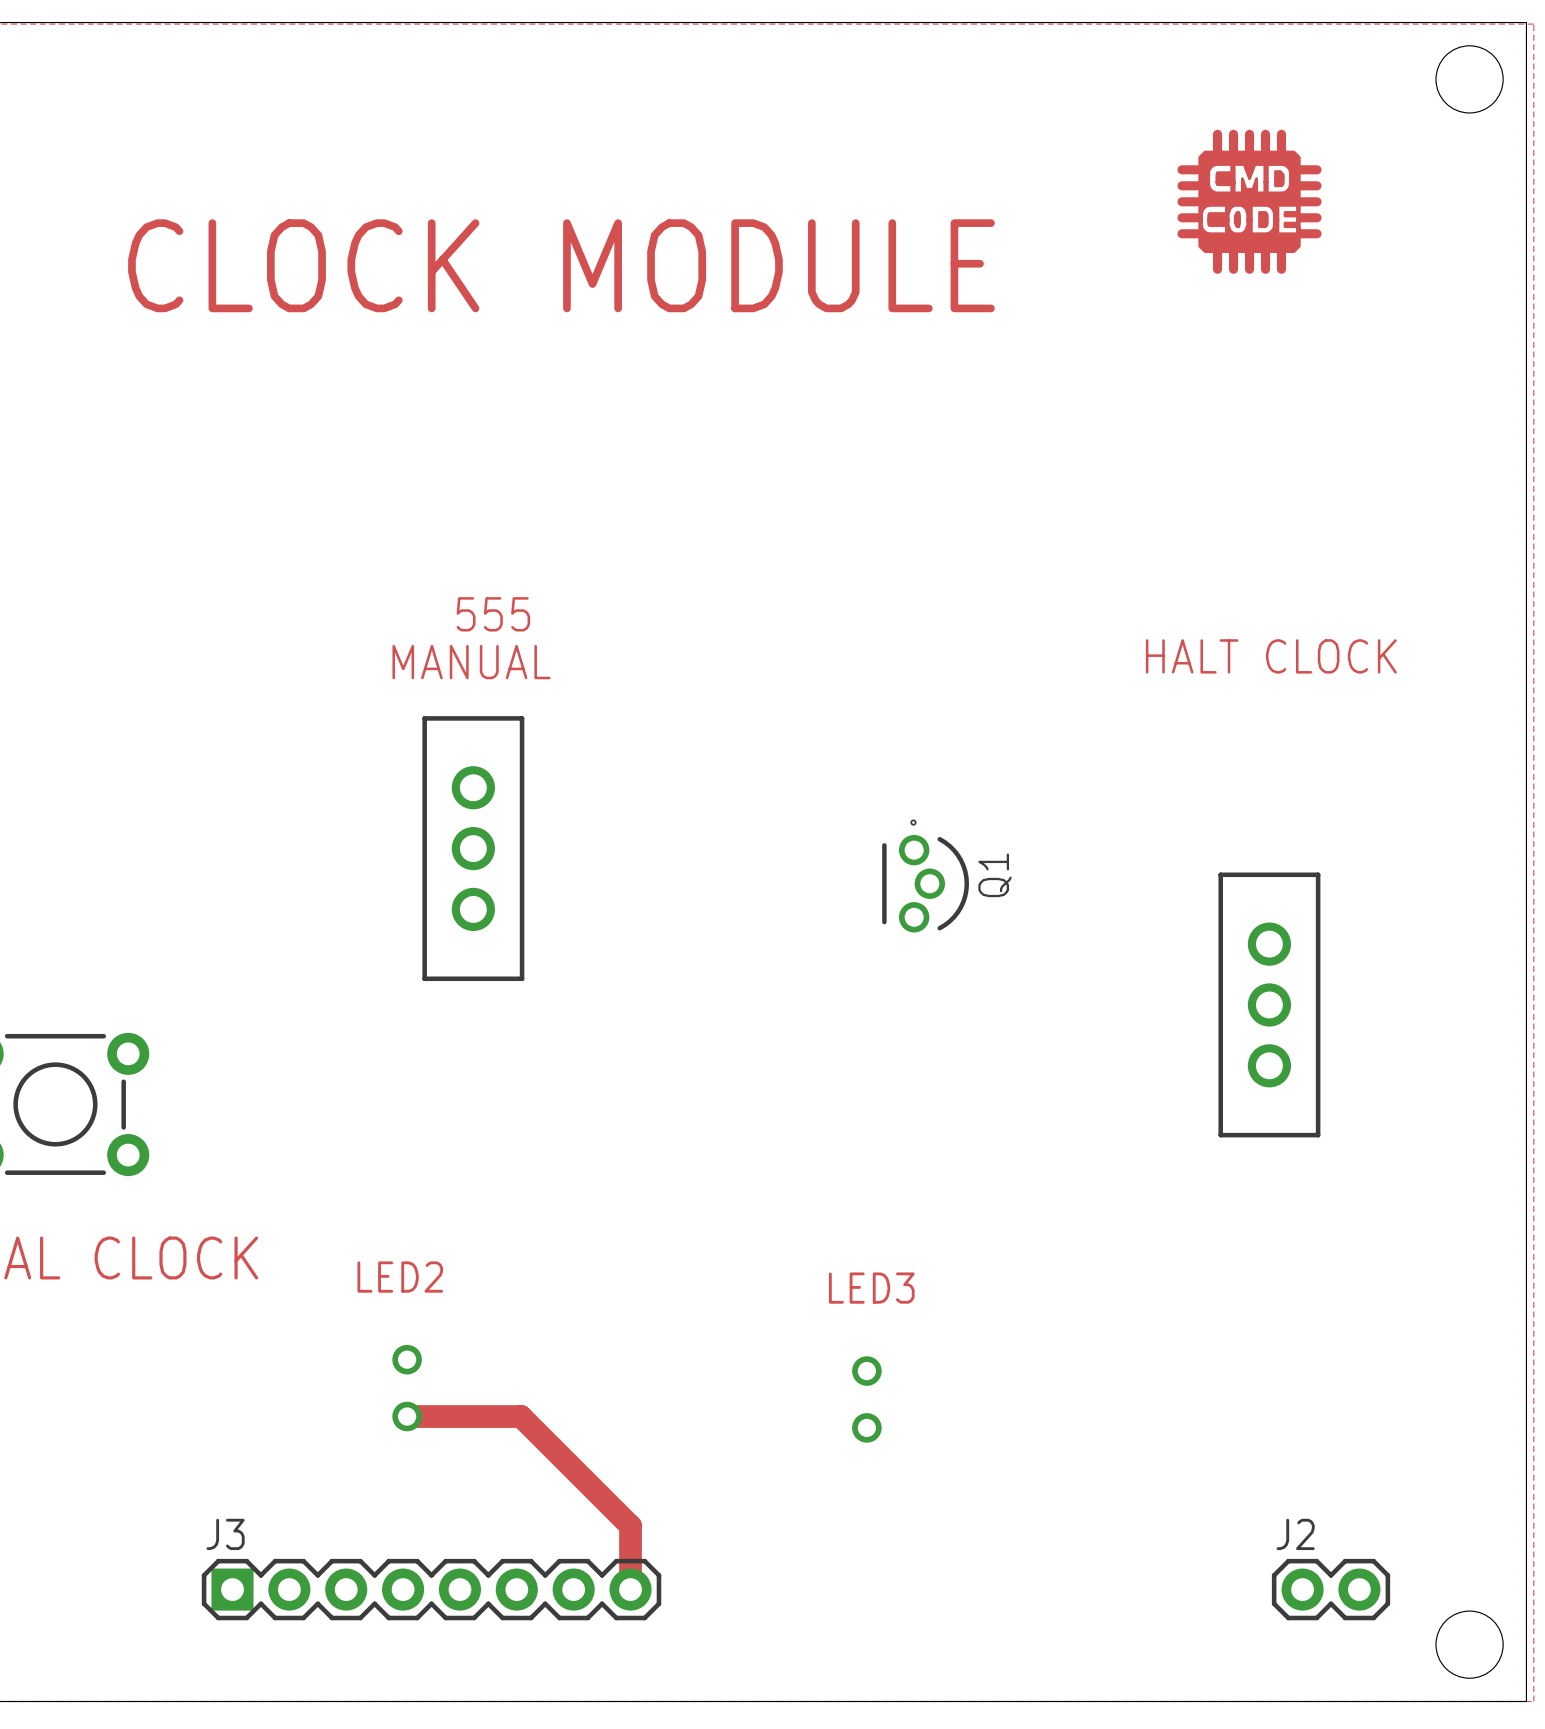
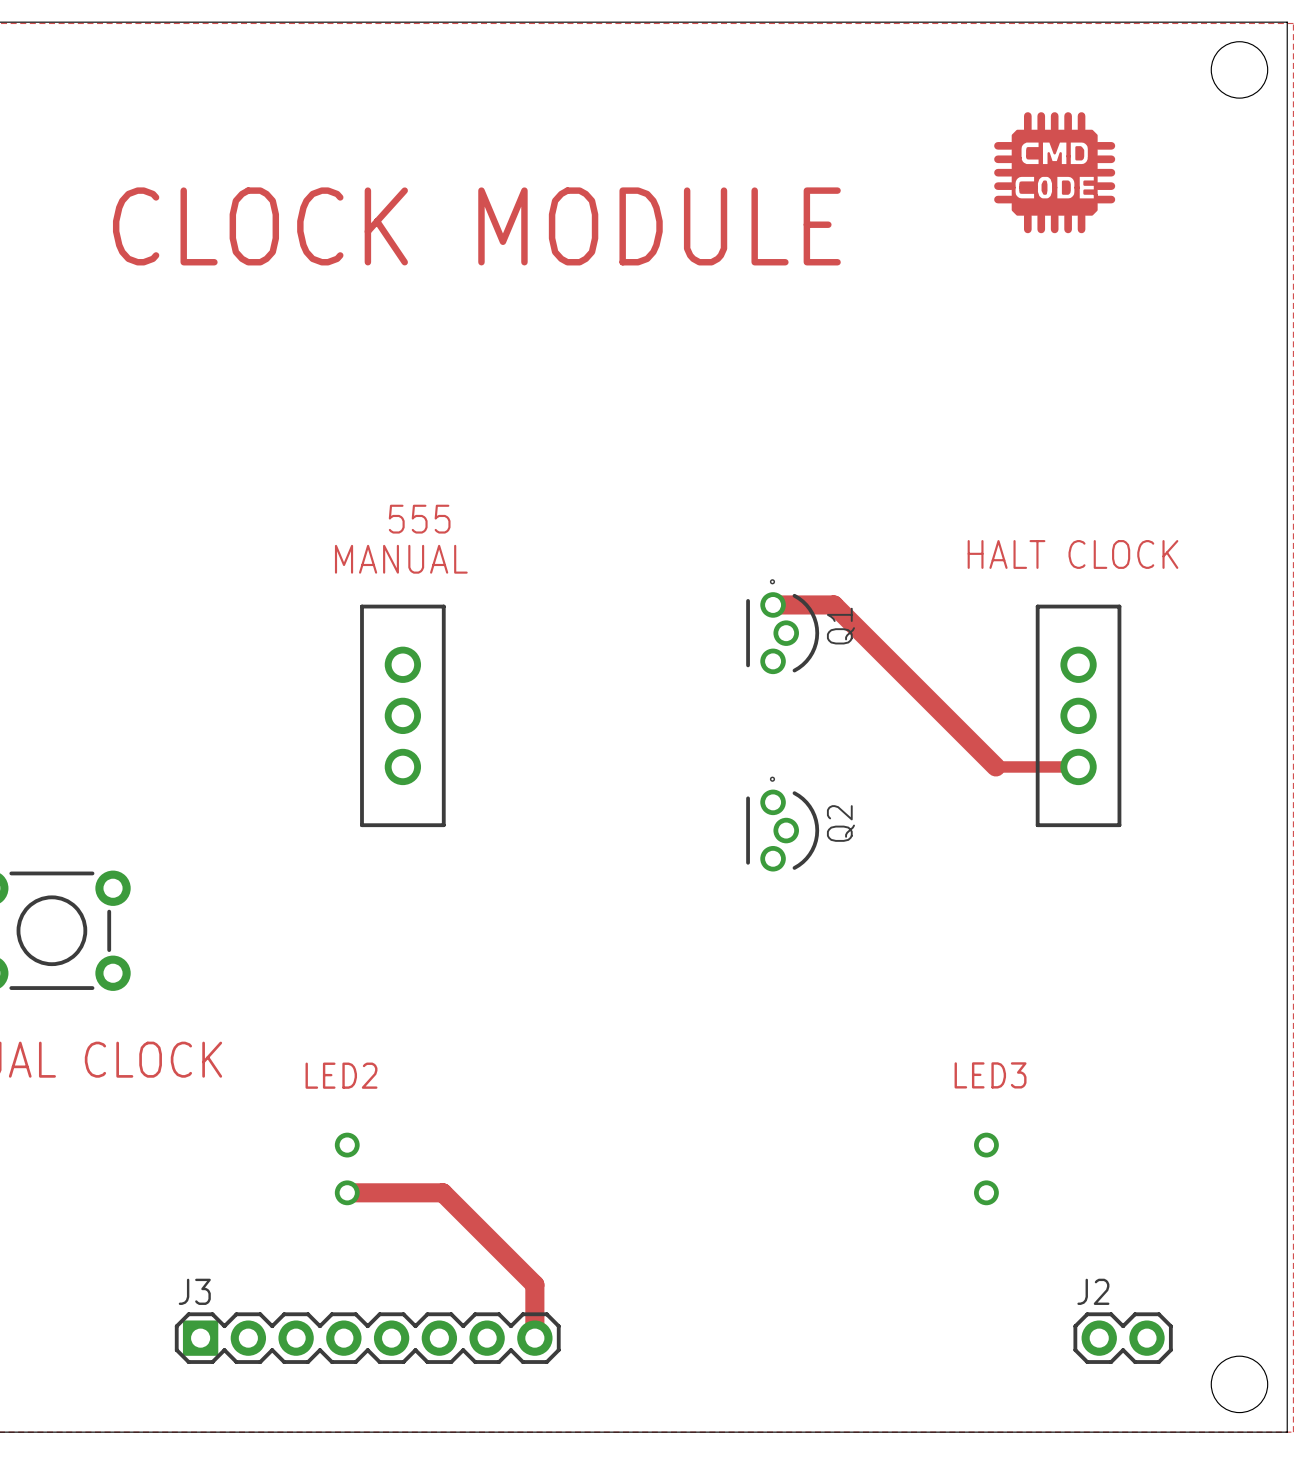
track: none -> (773, 604) (833, 604) (995, 766) (1078, 766)
Q1 position: (925, 875) -> (782, 626)
Q2: none -> (782, 824)
part position: (1269, 1004) -> (1078, 715)
LED3 position: (866, 1399) -> (986, 1168)

